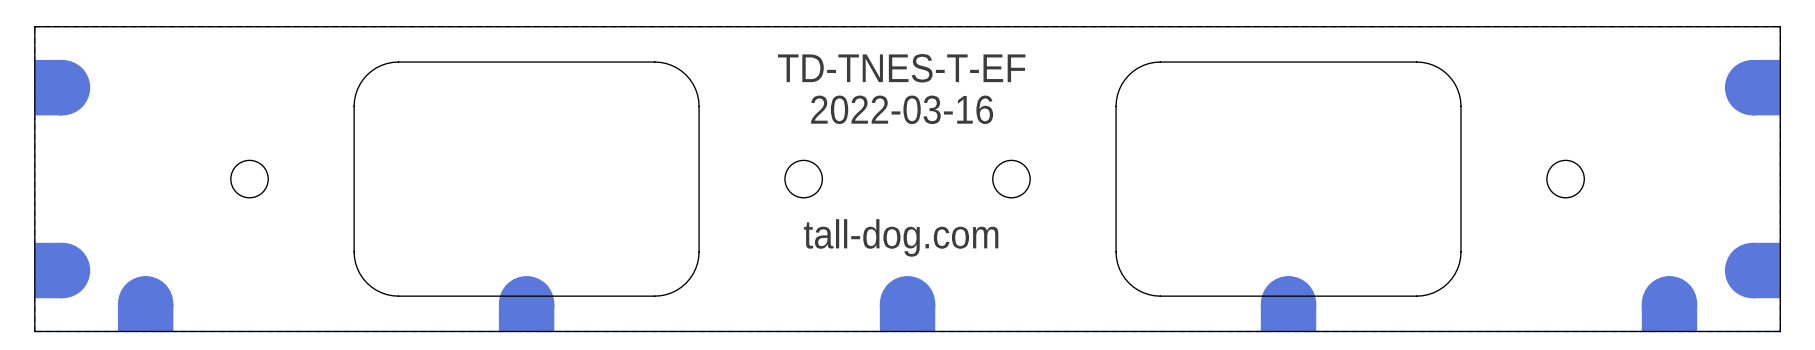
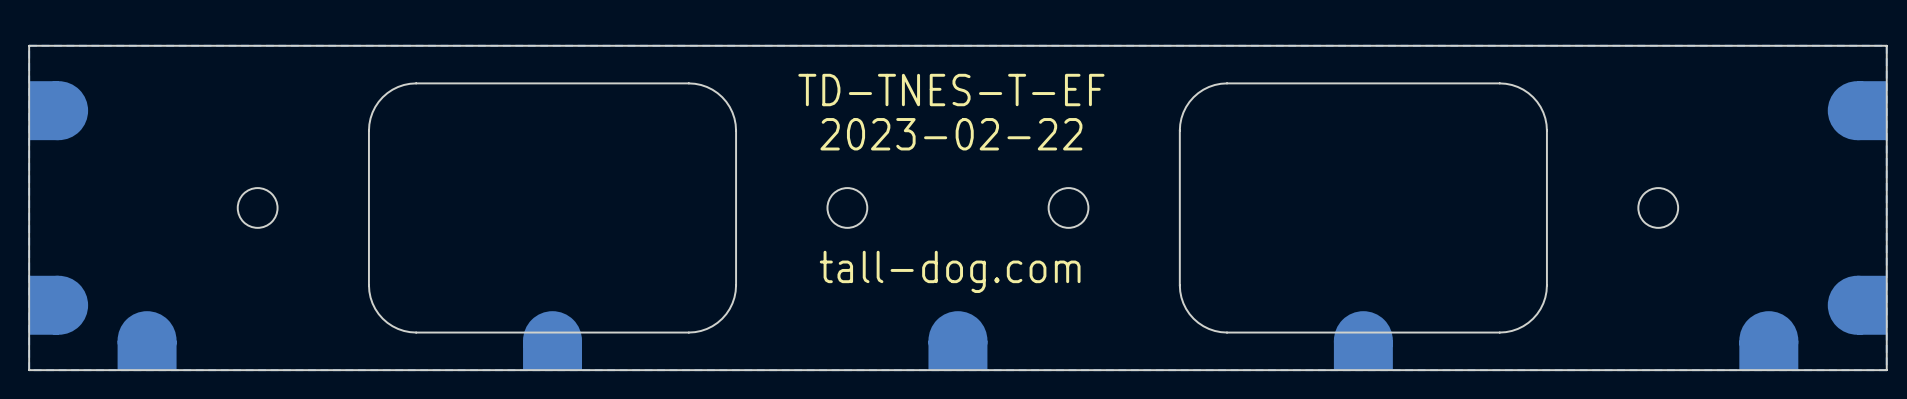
text: 2022-03-16 (902, 109) -> 2023-02-22 (951, 134)

